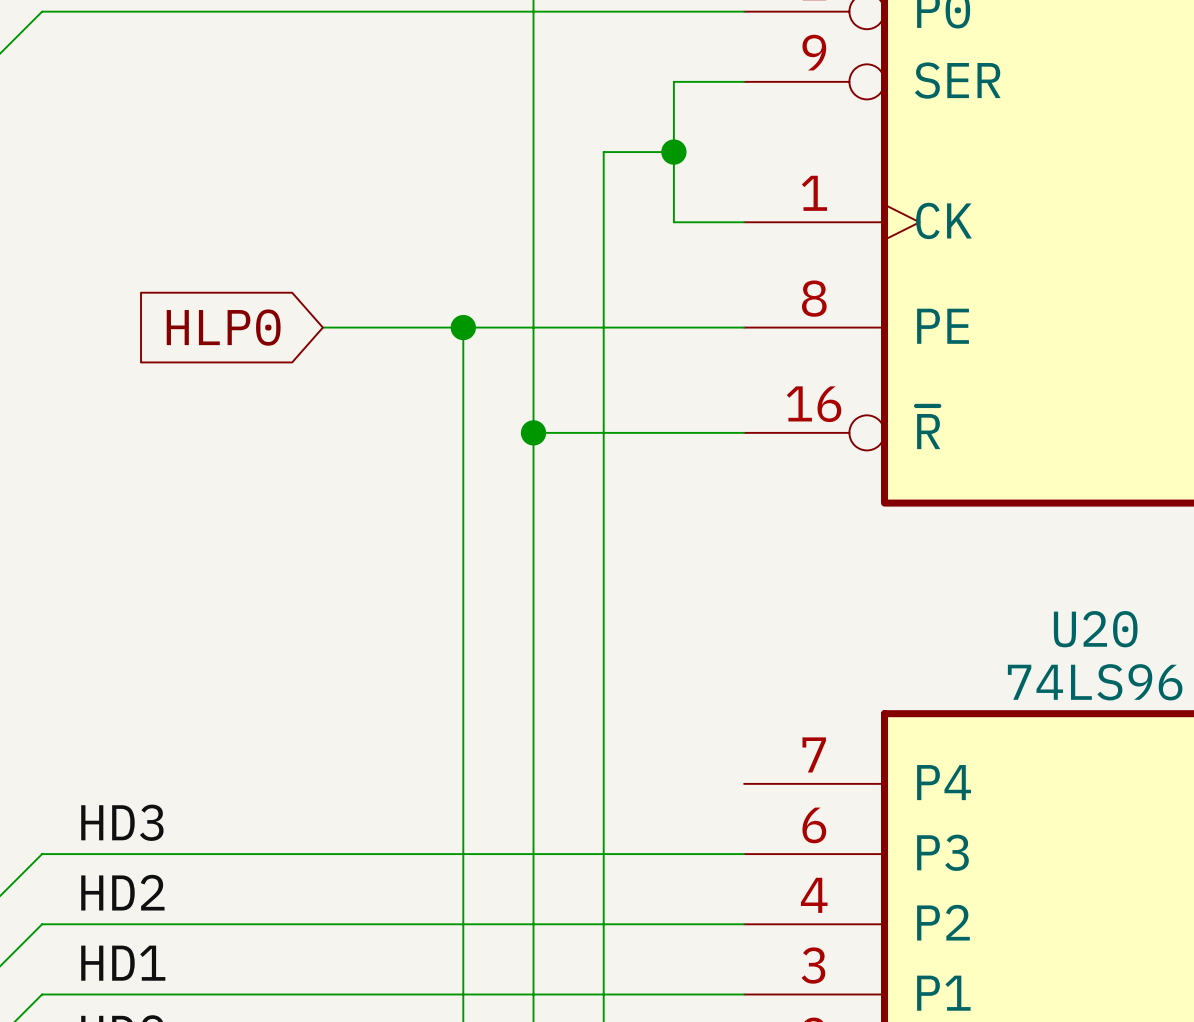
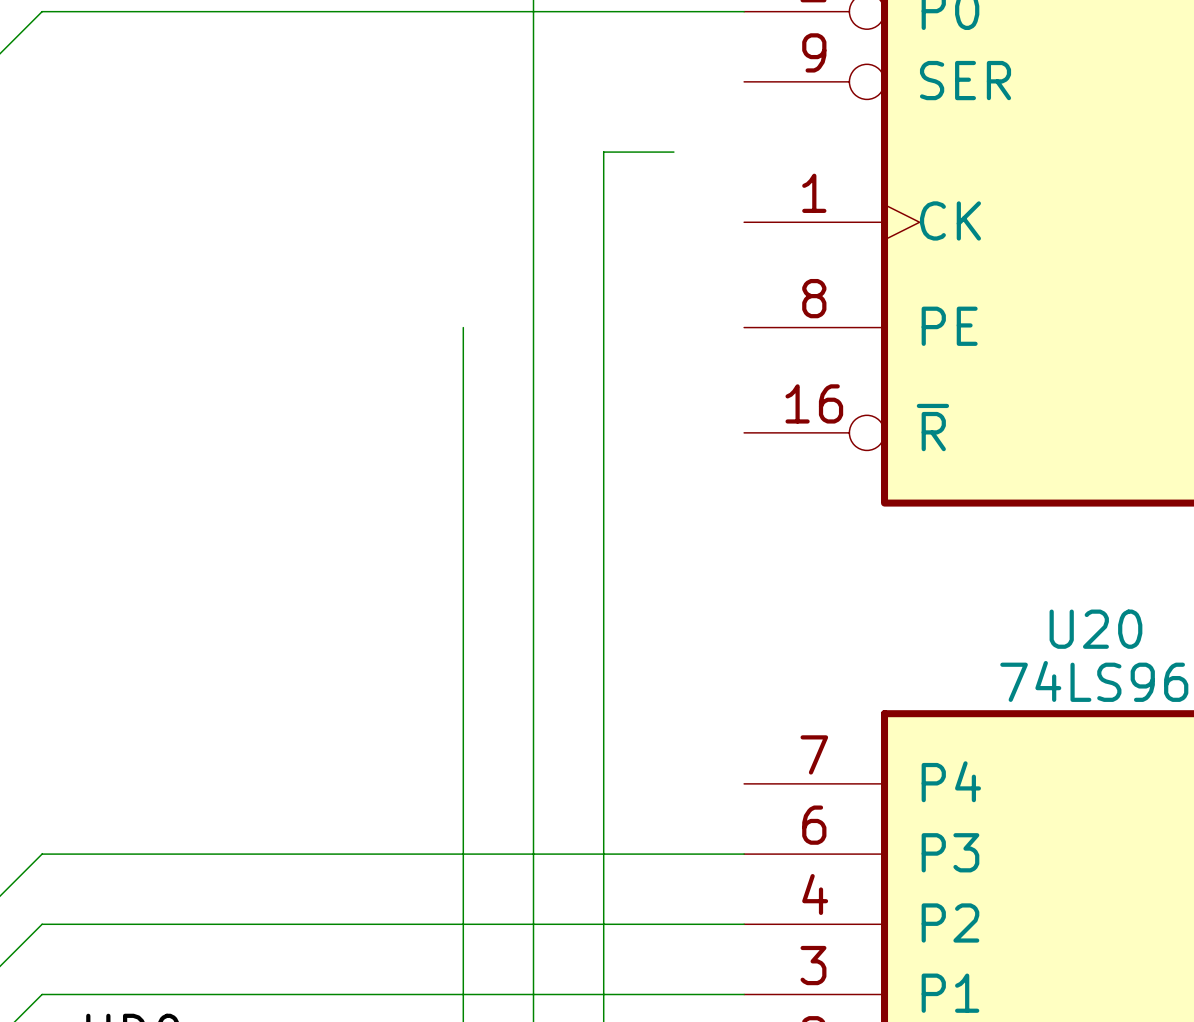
wire: (744, 81) (673, 81) (673, 222) (744, 222) -> none
junction: (673, 152) -> none
global label: HLP0 (223, 327) -> none
wire: (322, 327) (744, 327) -> none
junction: (463, 327) -> none
wire: (533, 432) (744, 432) -> none
junction: (533, 432) -> none
label: HD3 (122, 822) -> none
label: HD2 (122, 892) -> none
label: HD1 (123, 963) -> none

